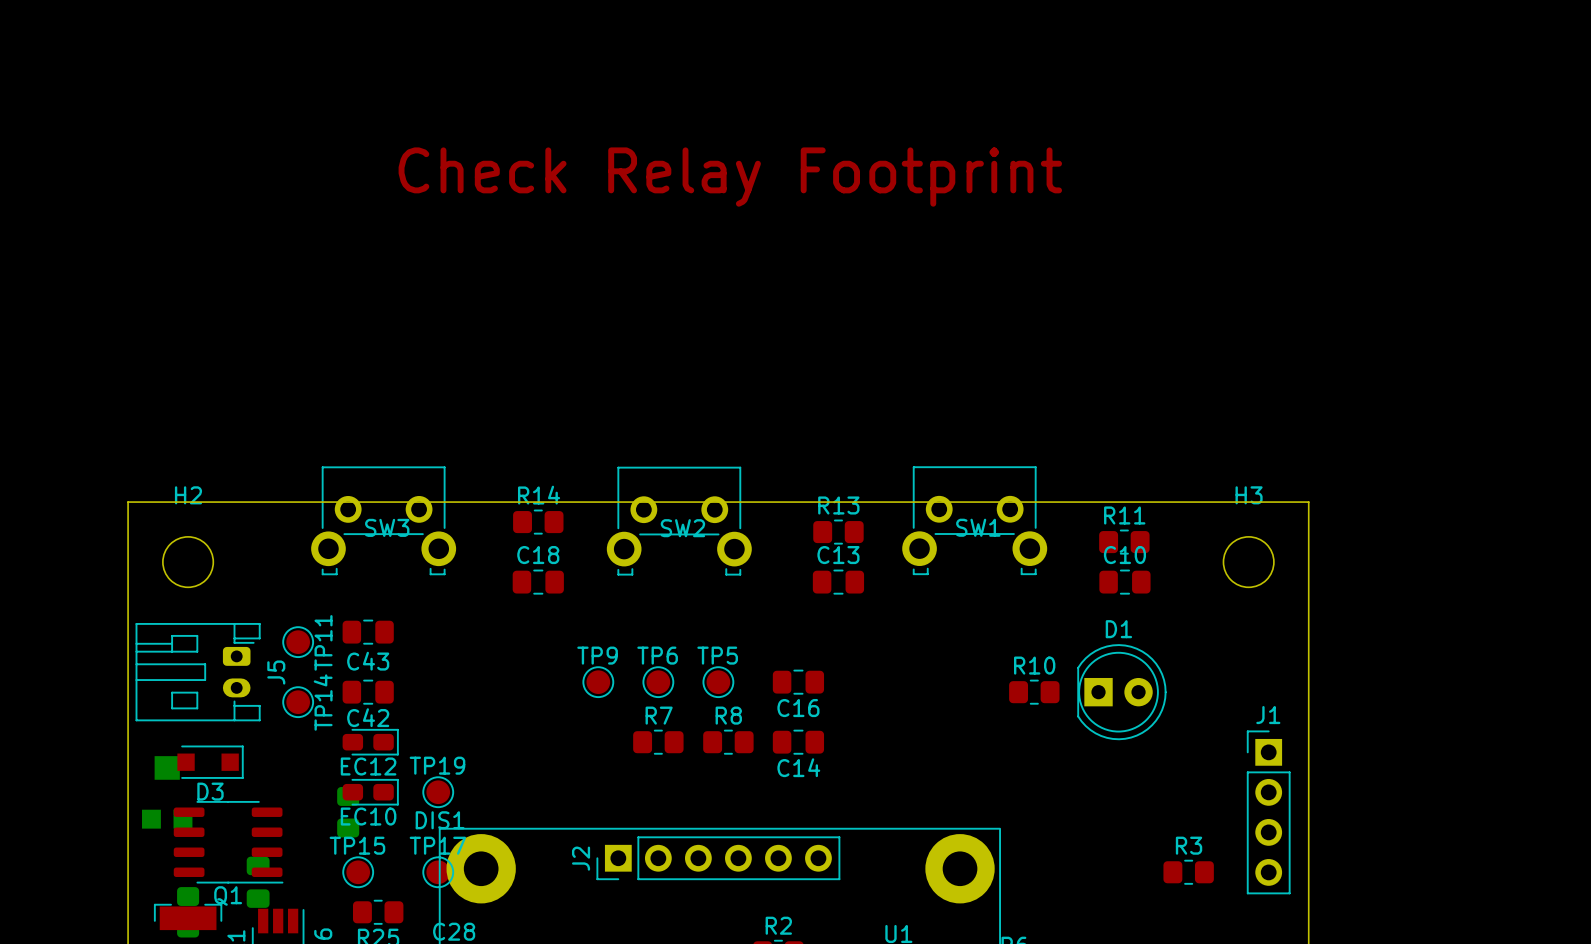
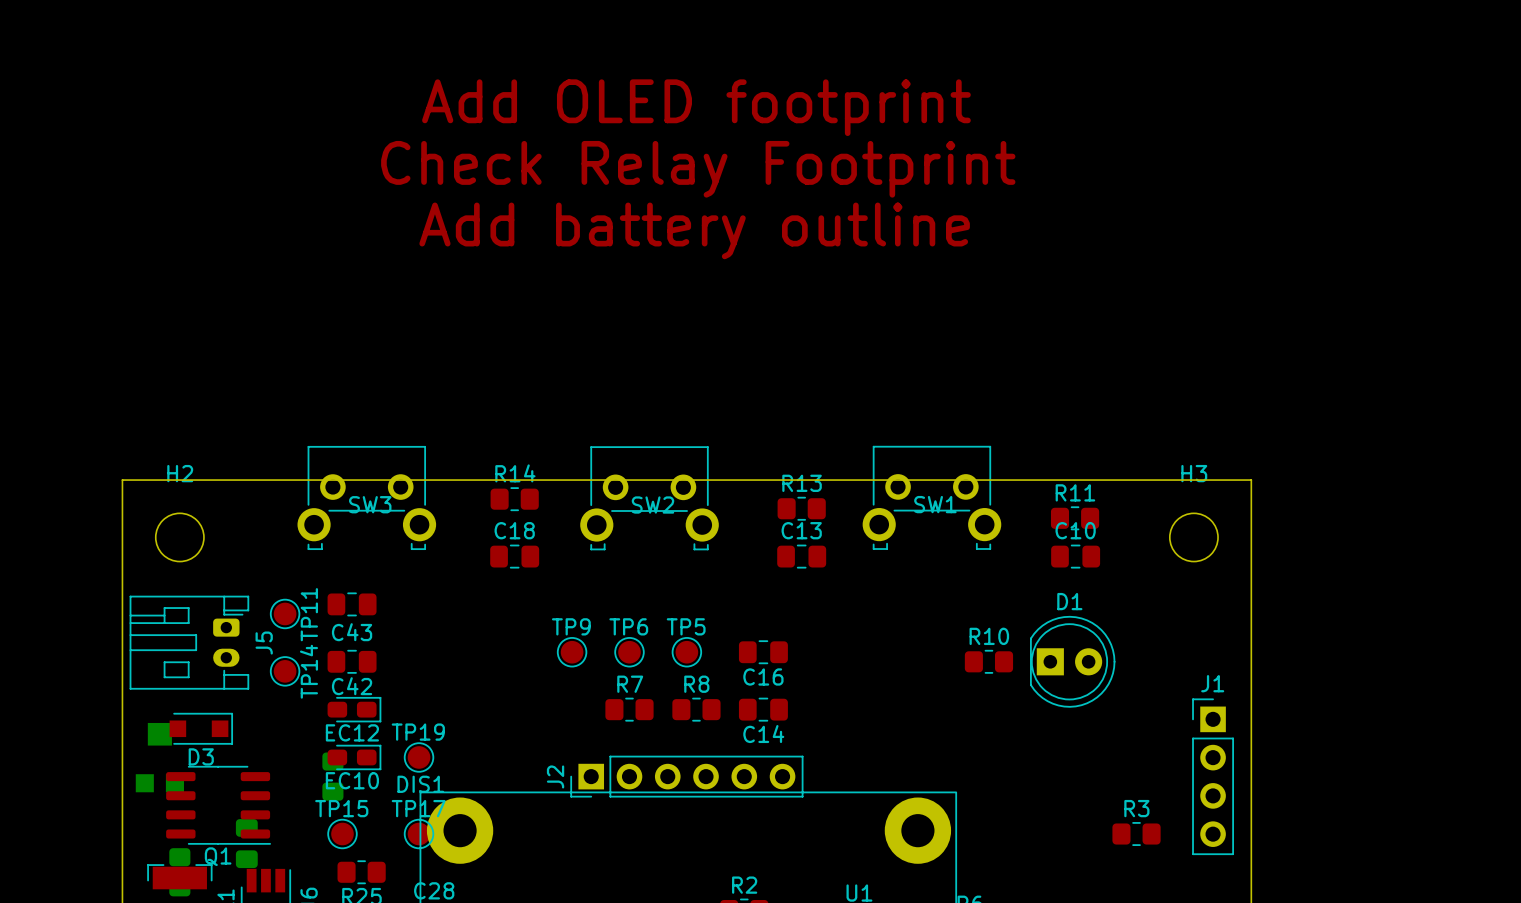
text: none -> Add OLED footprint (696, 107)
text: none -> Add battery outline (694, 230)
J2 position: (718, 858) -> (686, 776)

